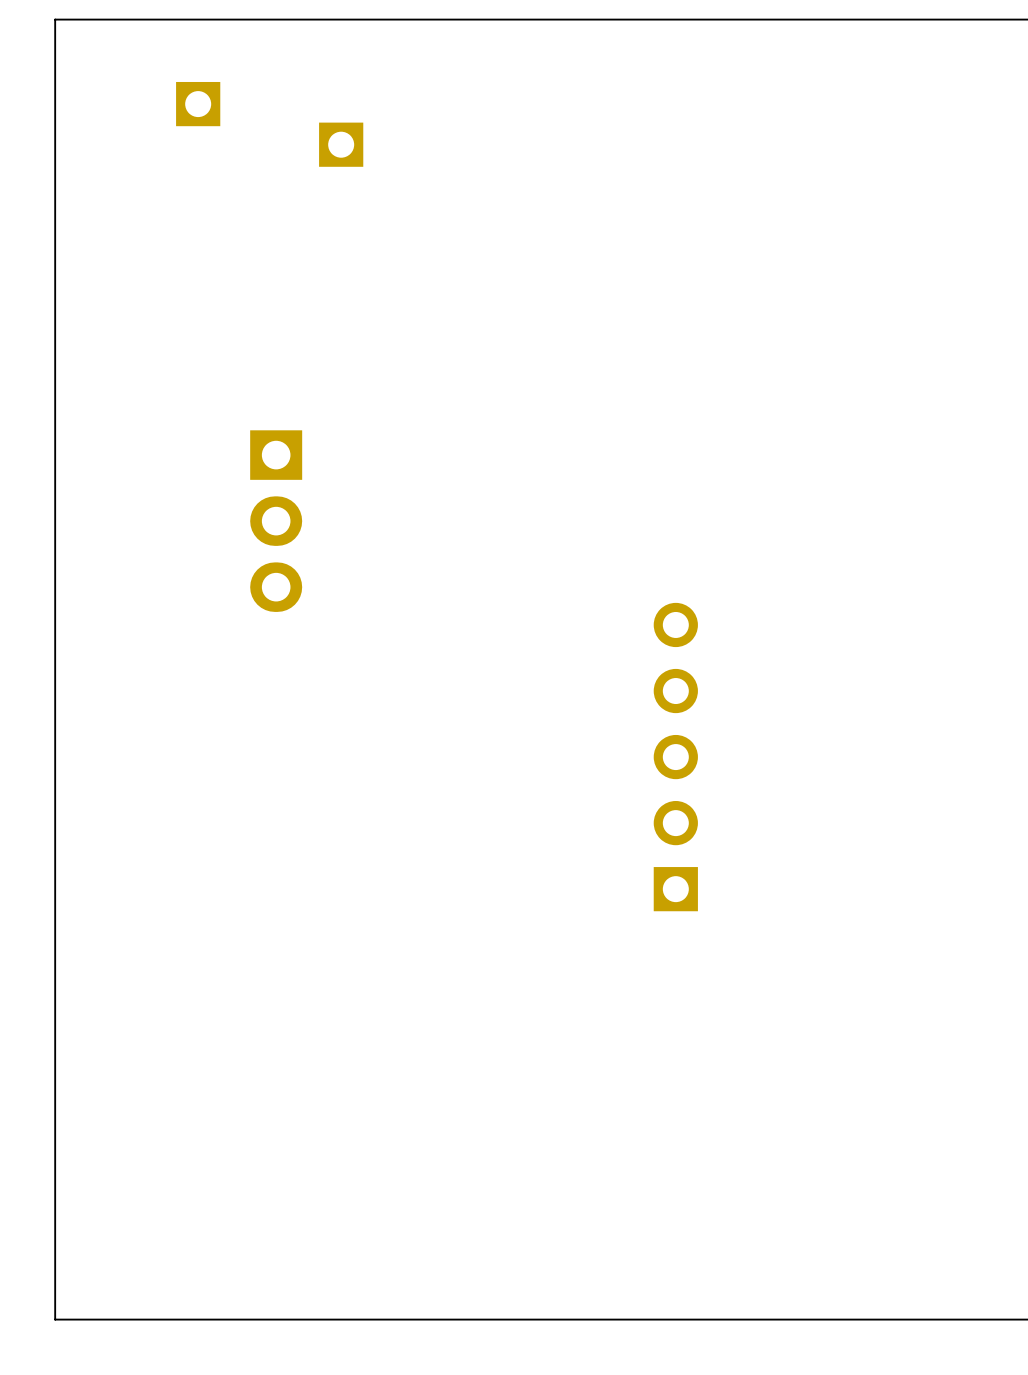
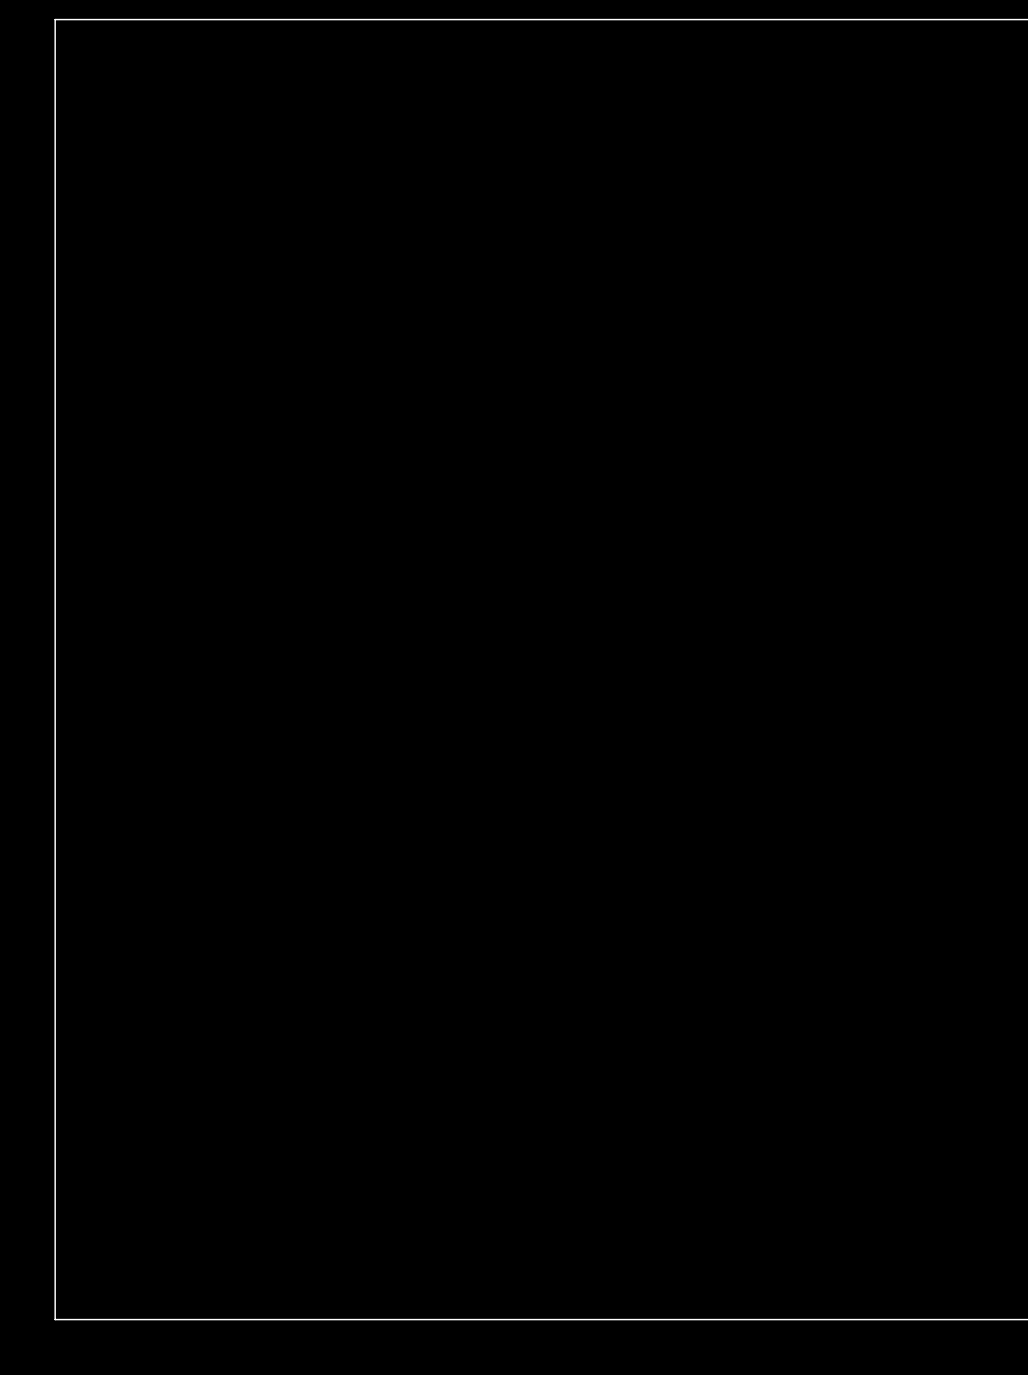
part: (198, 104) -> none
part: (341, 144) -> none
part: (276, 521) -> none
part: (675, 757) -> none

